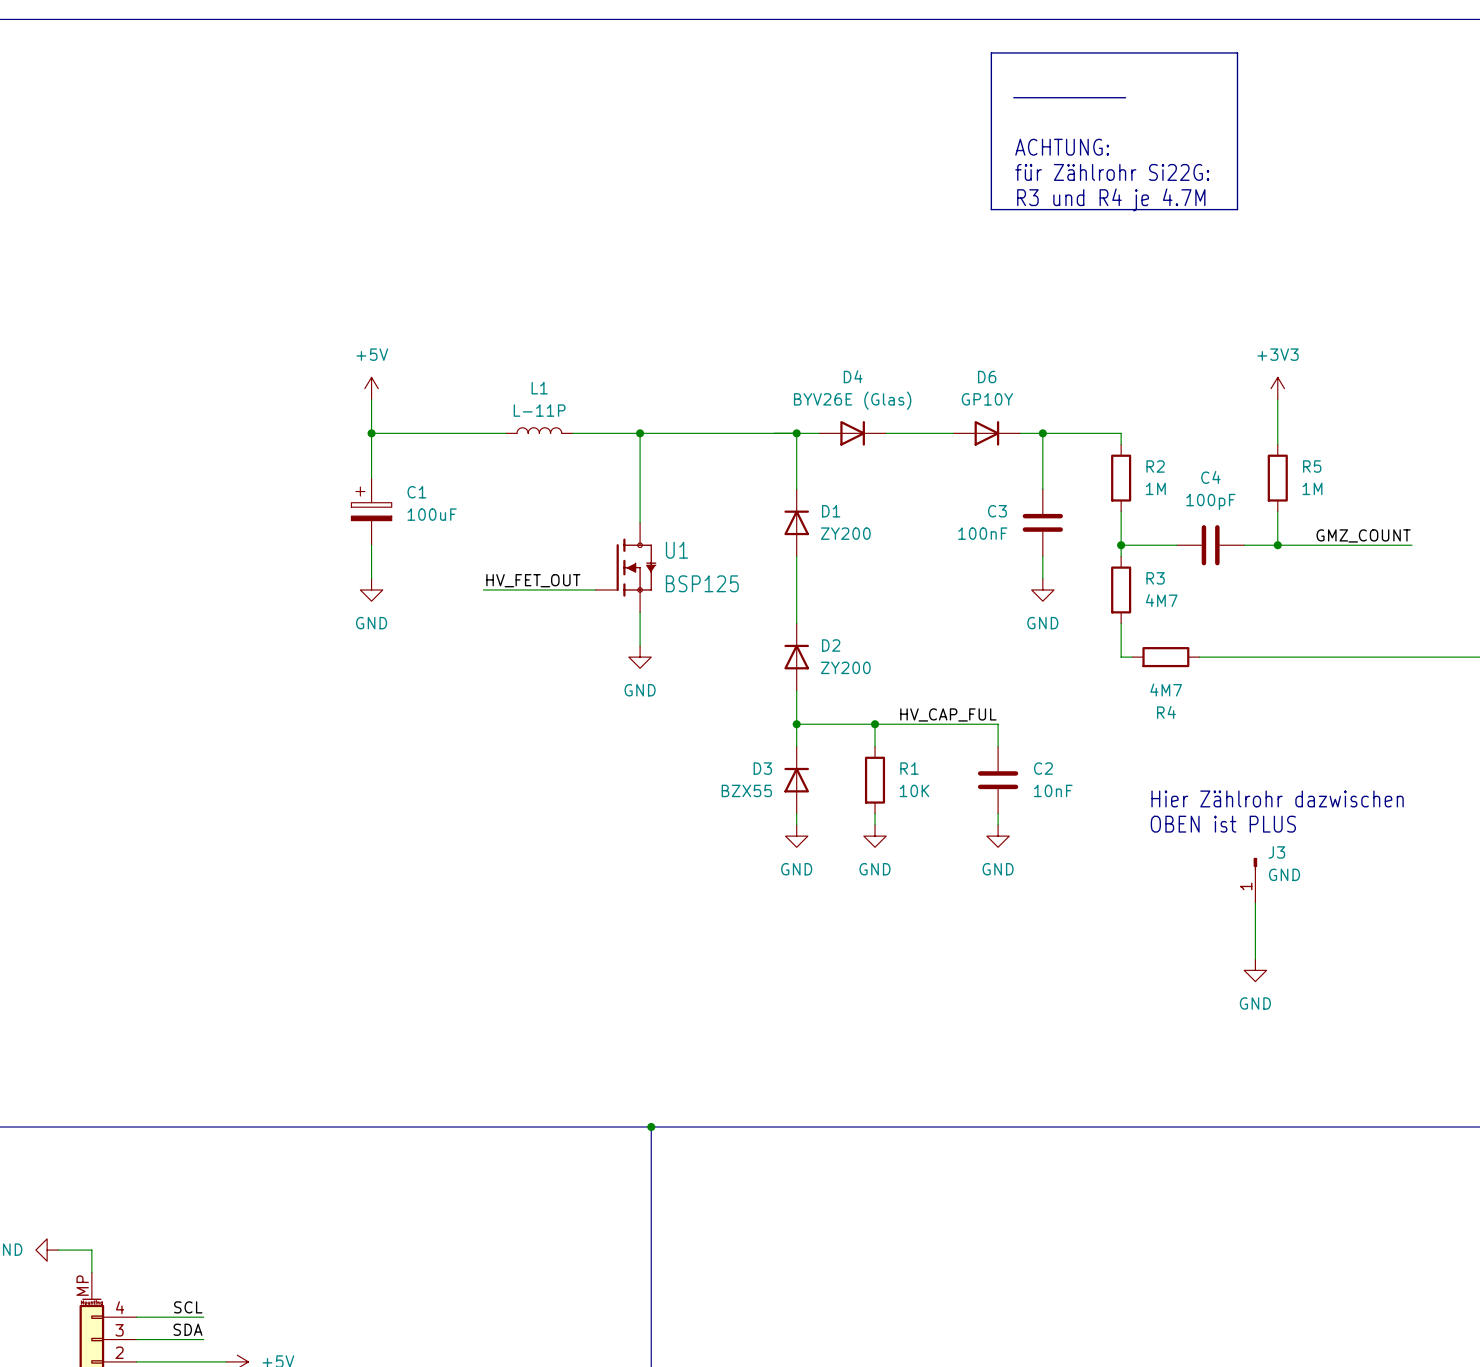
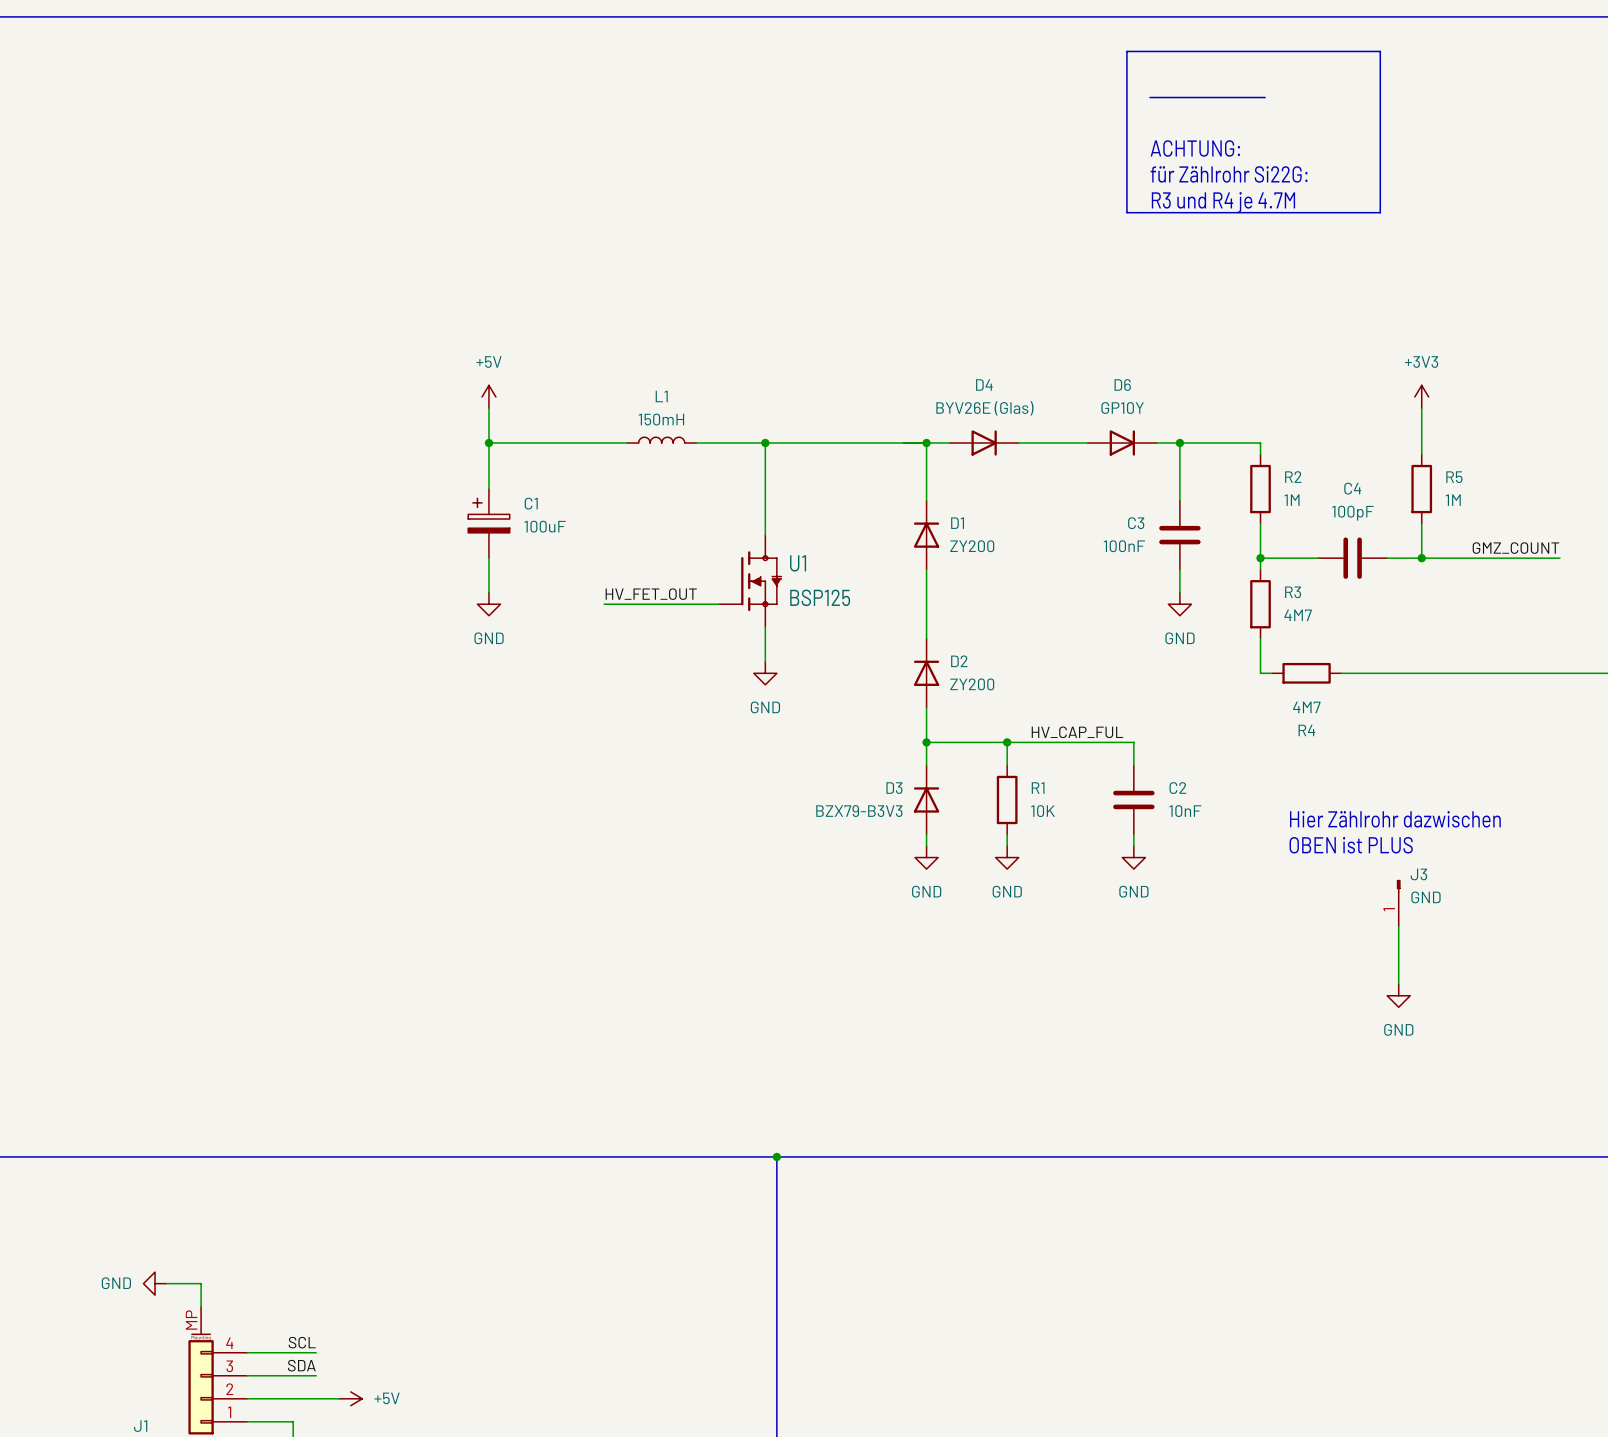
L1 value: L-11P (539, 410) -> 150mH (661, 419)
D3 value: BZX55 (746, 790) -> BZX79-B3V3 (859, 811)

